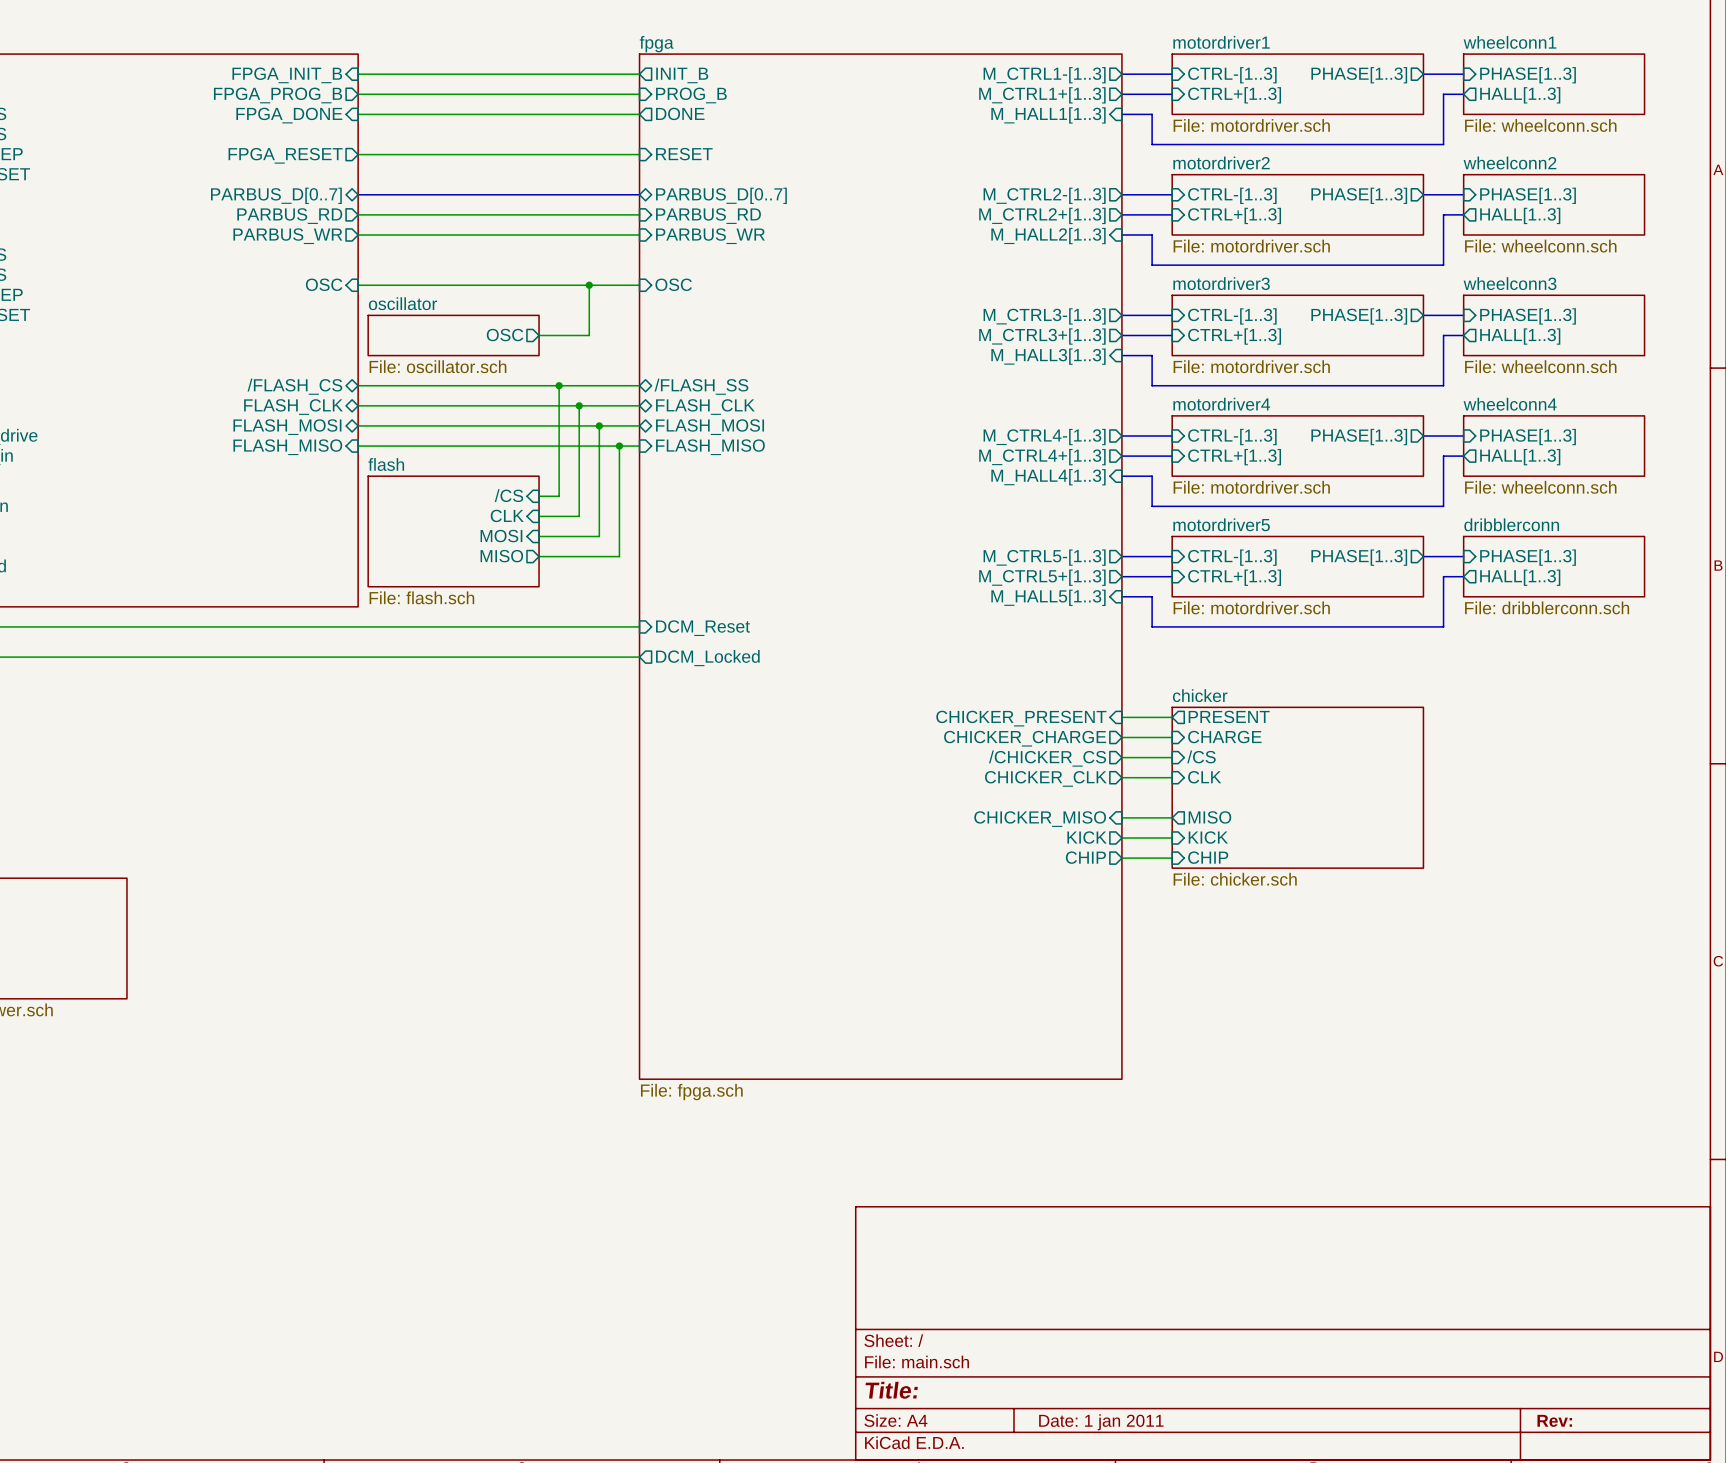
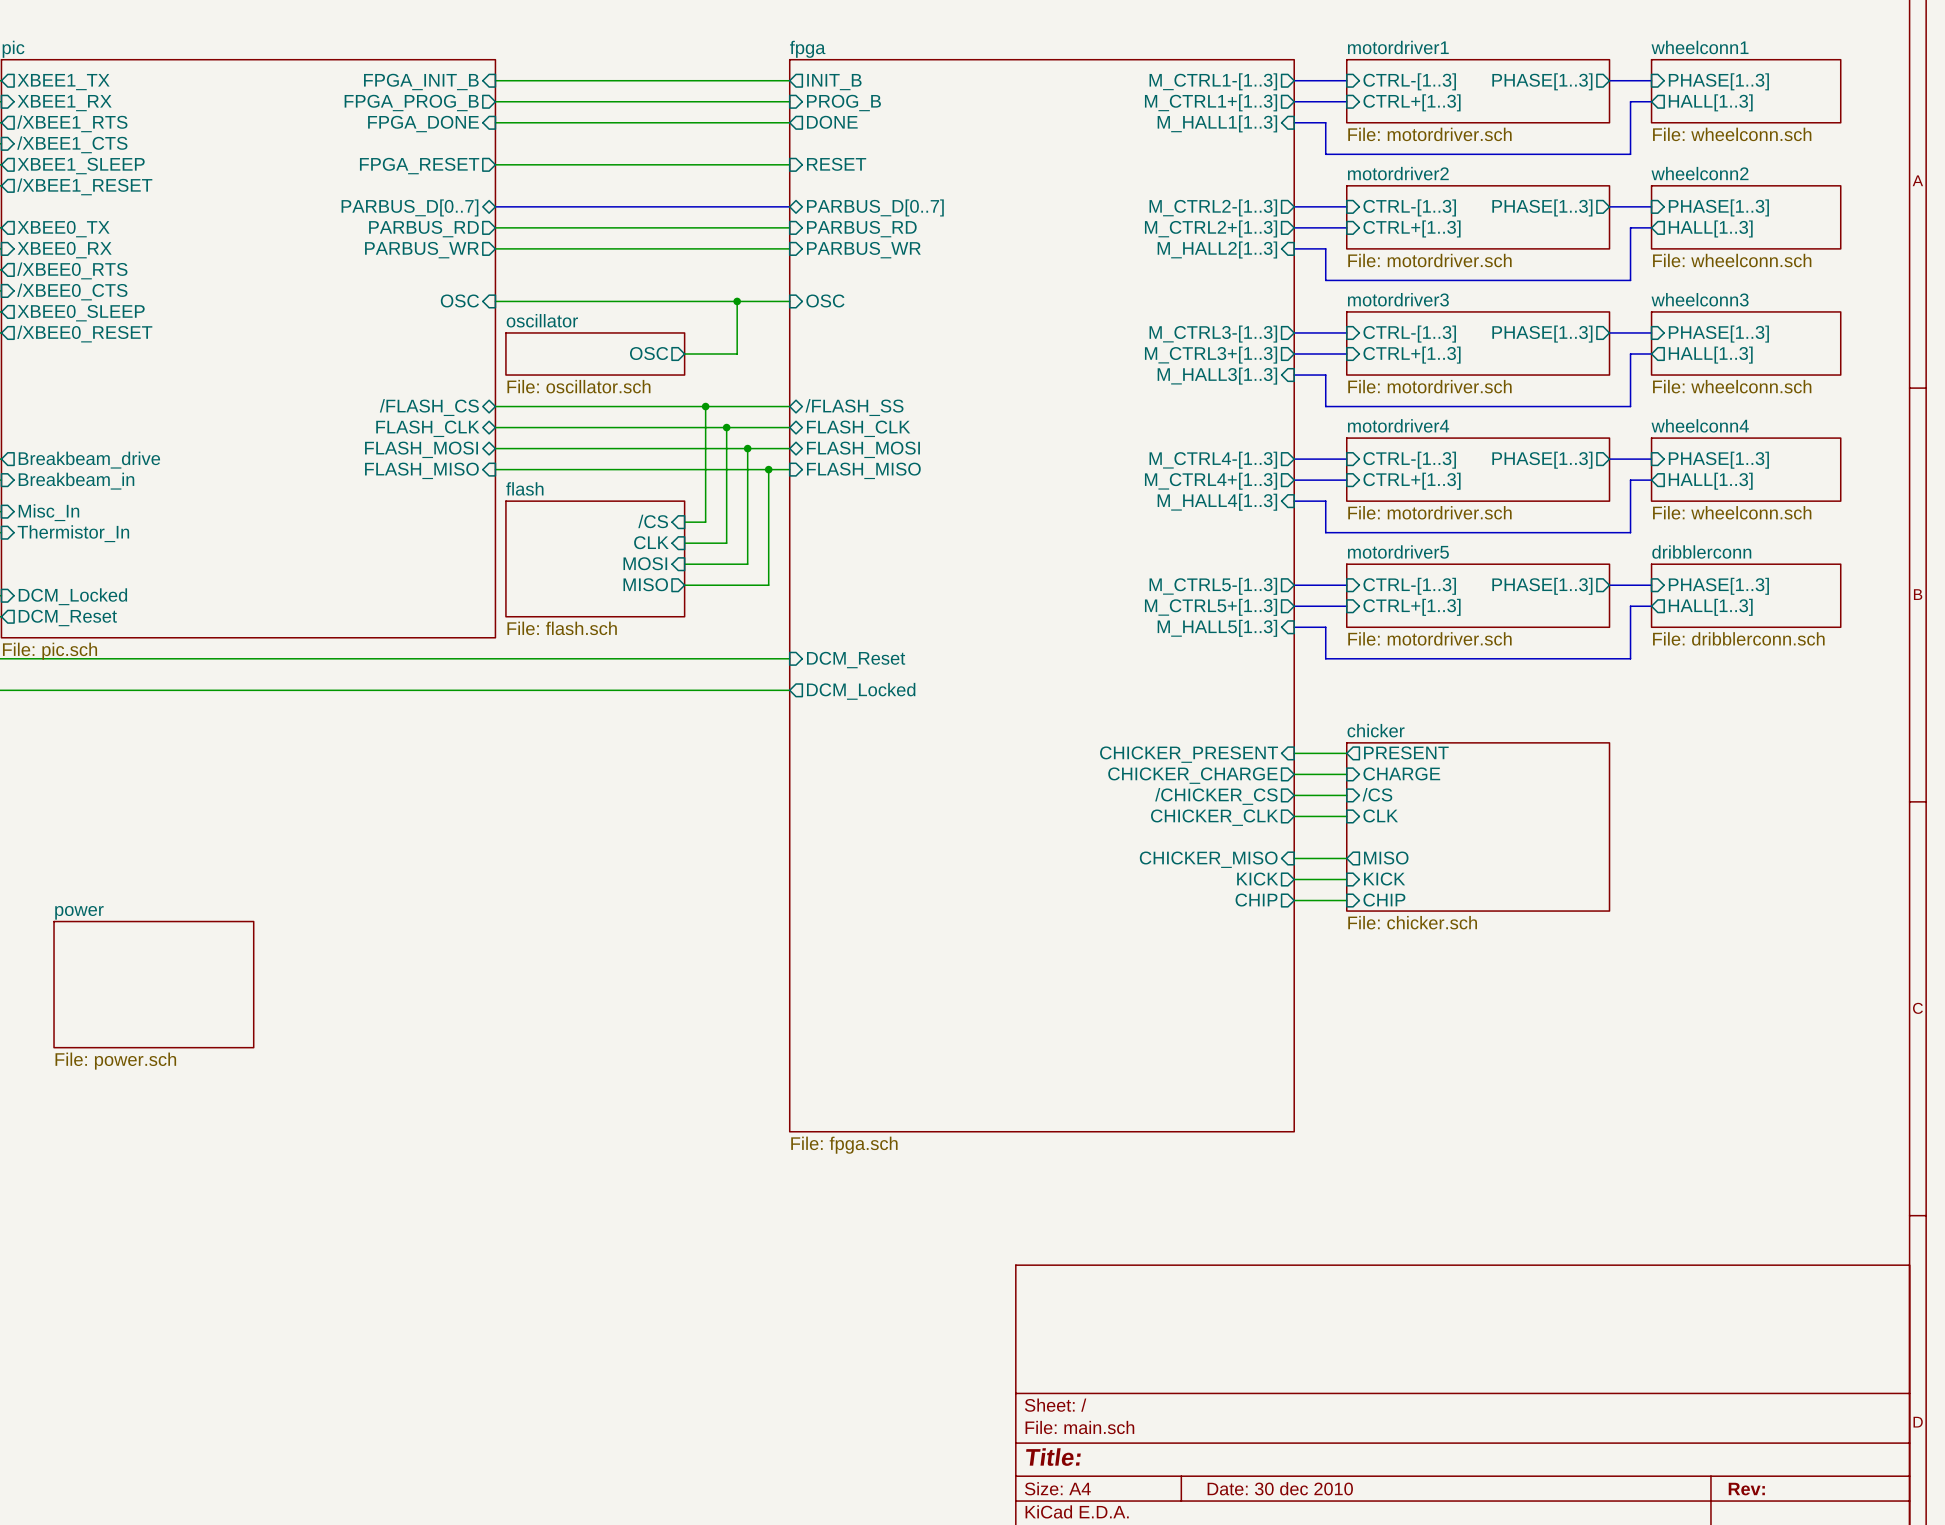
title block: Date: 1 jan 2011 (1101, 1422) -> Date: 30 dec 2010 (1280, 1488)

